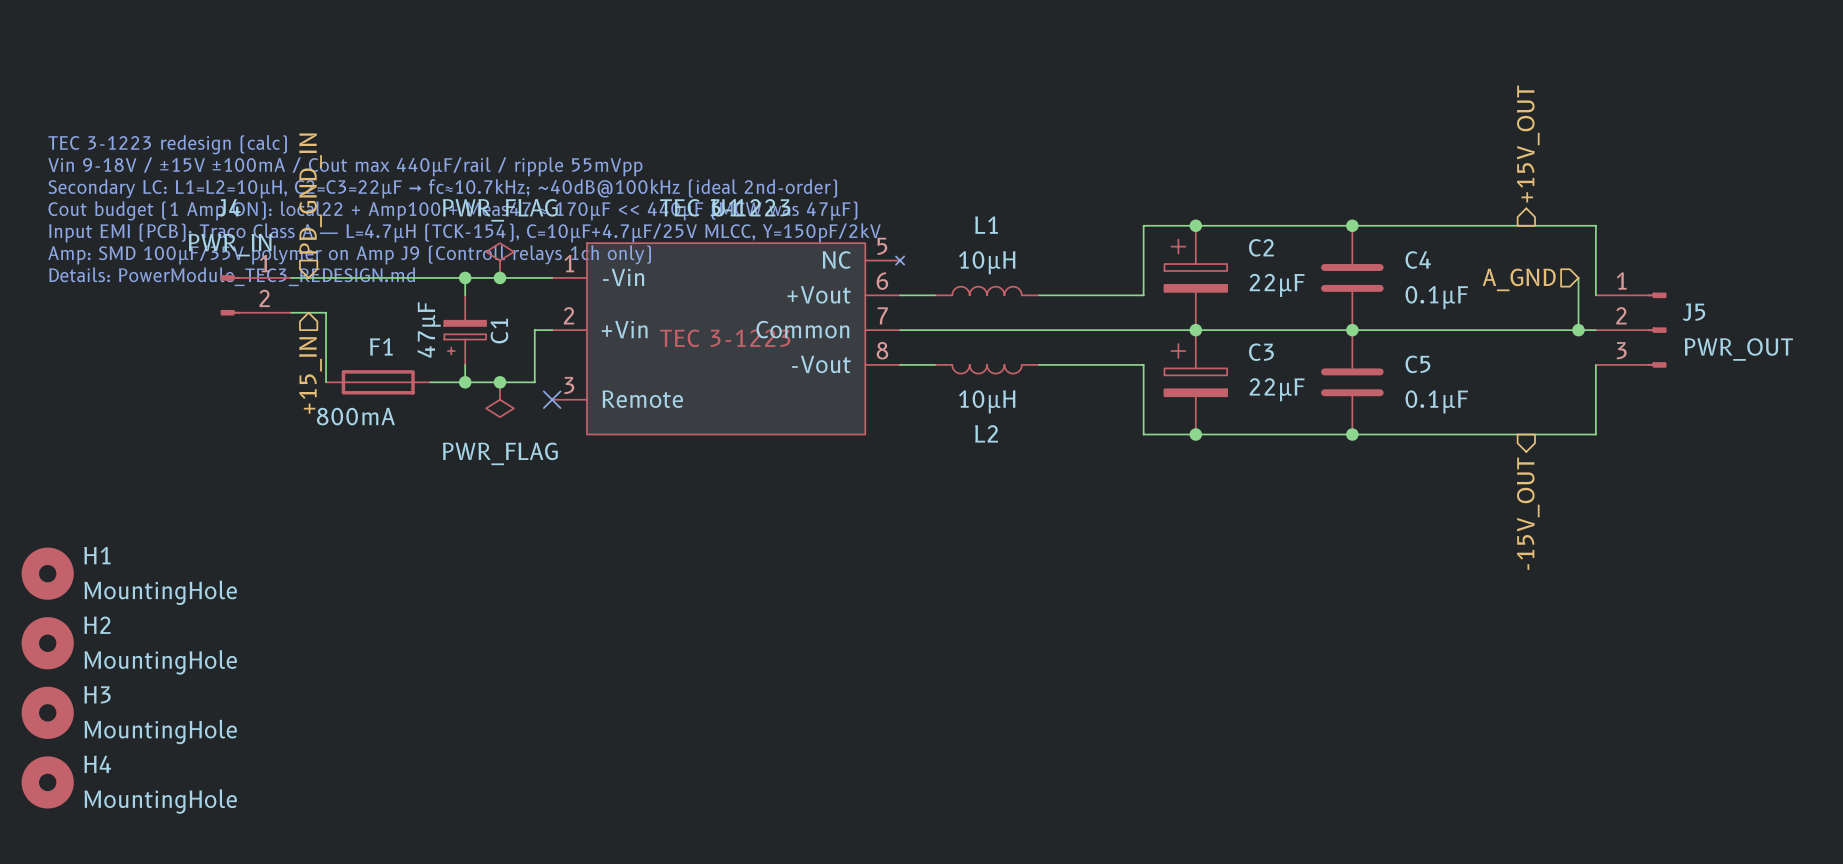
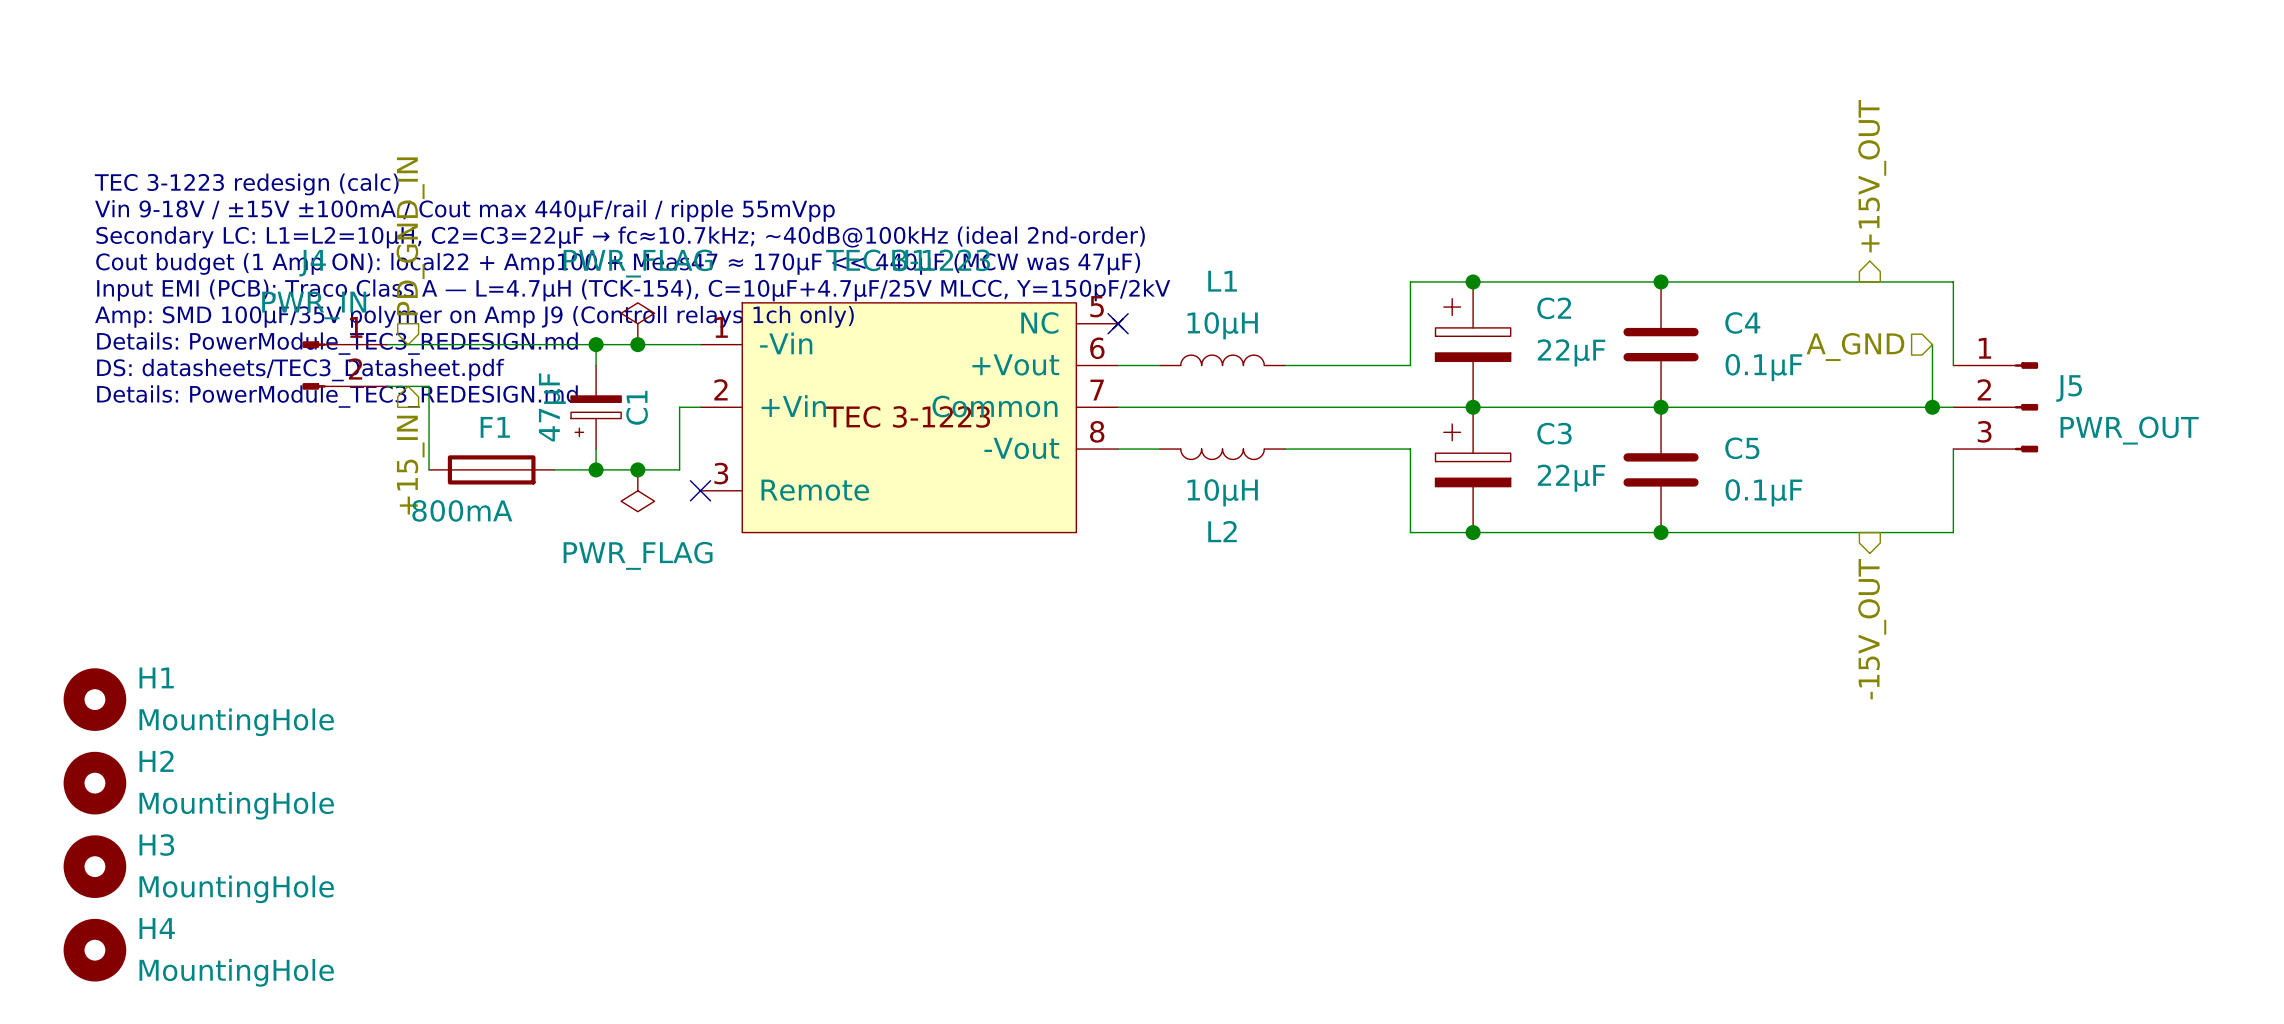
no-connect mark: none -> (1118, 323)
text: none -> DS: datasheets/TEC3_Datasheet.pdf (300, 370)
text: none -> Details: PowerModule_TEC3_REDESIGN.md (337, 396)

